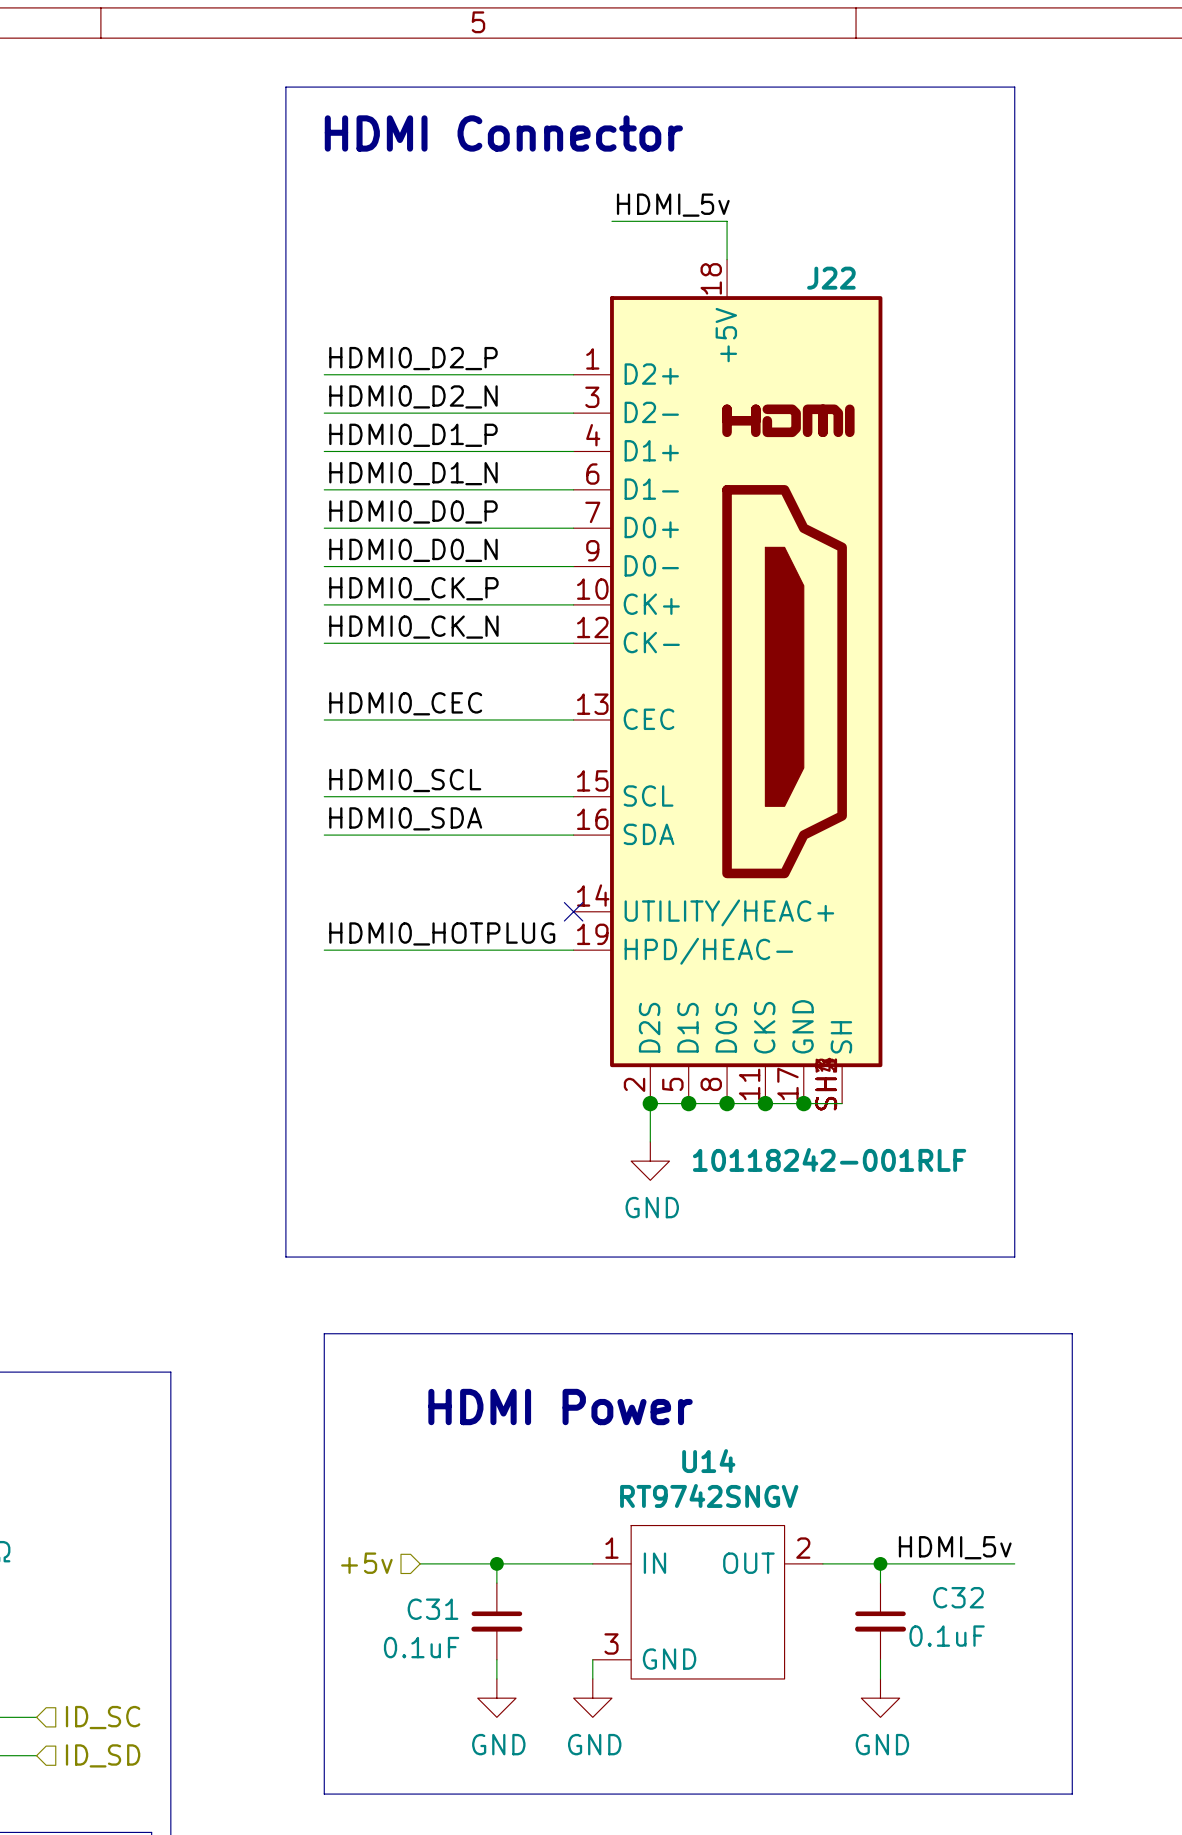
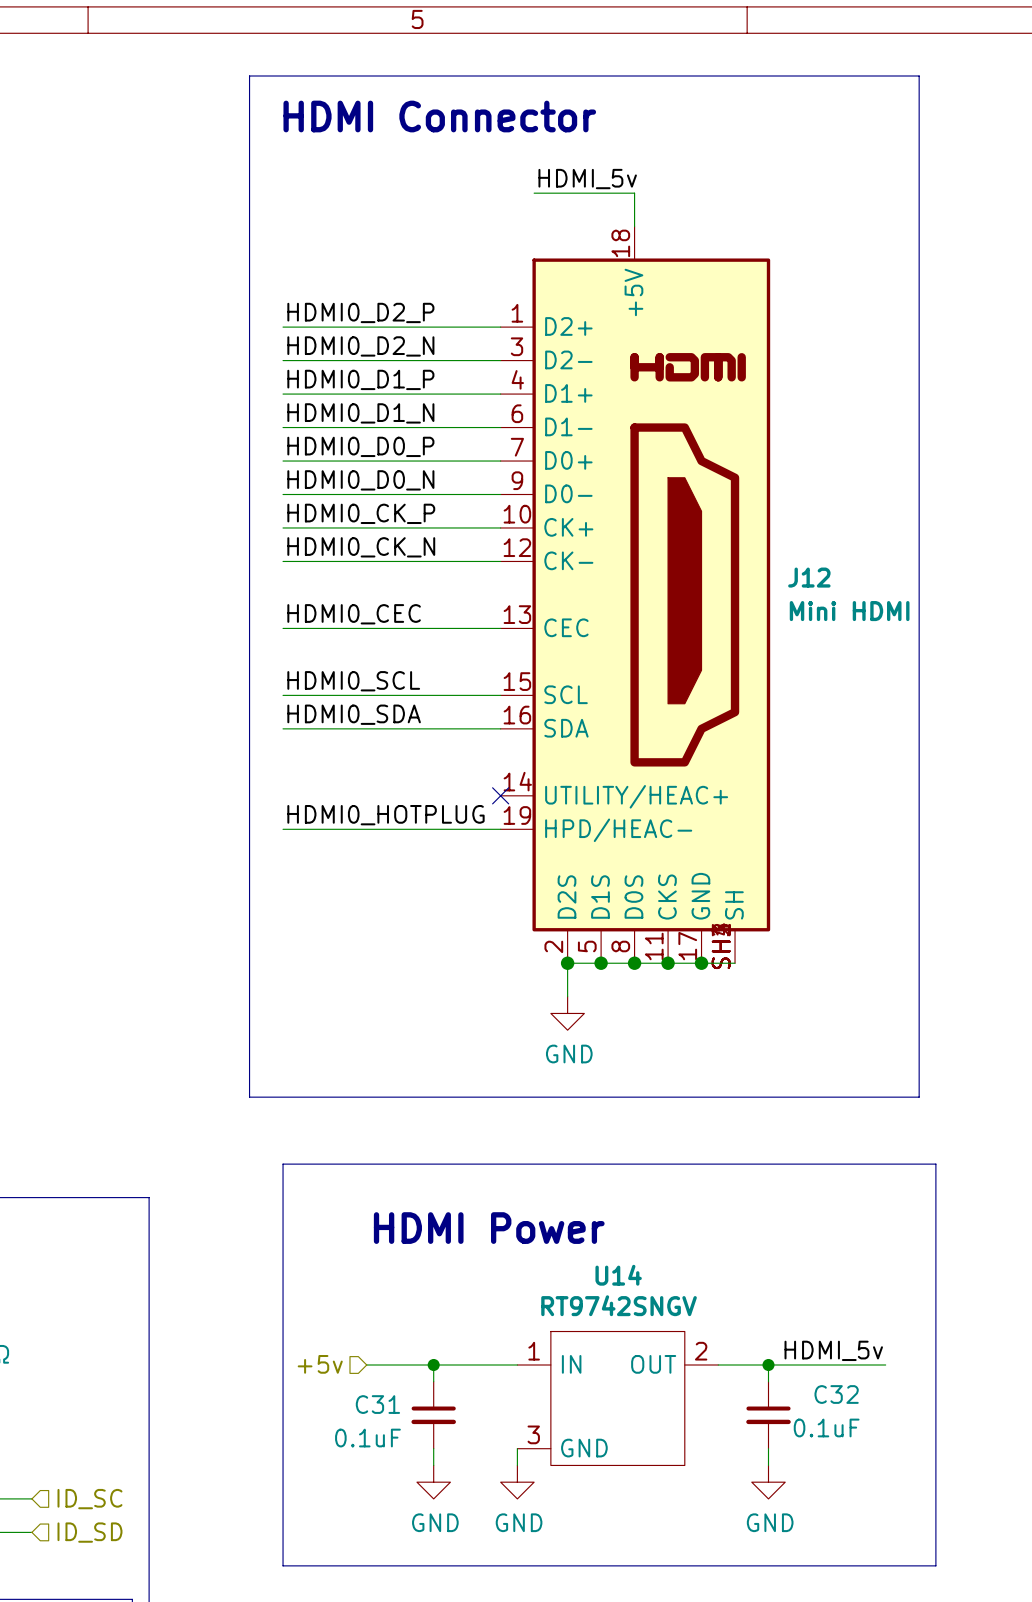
line: (1014, 87) (1014, 1257) -> (885, 75) (919, 75) (919, 1097) (885, 1097)
J22 name: J22 (831, 278) -> J12 (809, 577)
J22 value: 10118242-001RLF (829, 1159) -> Mini HDMI (849, 611)

